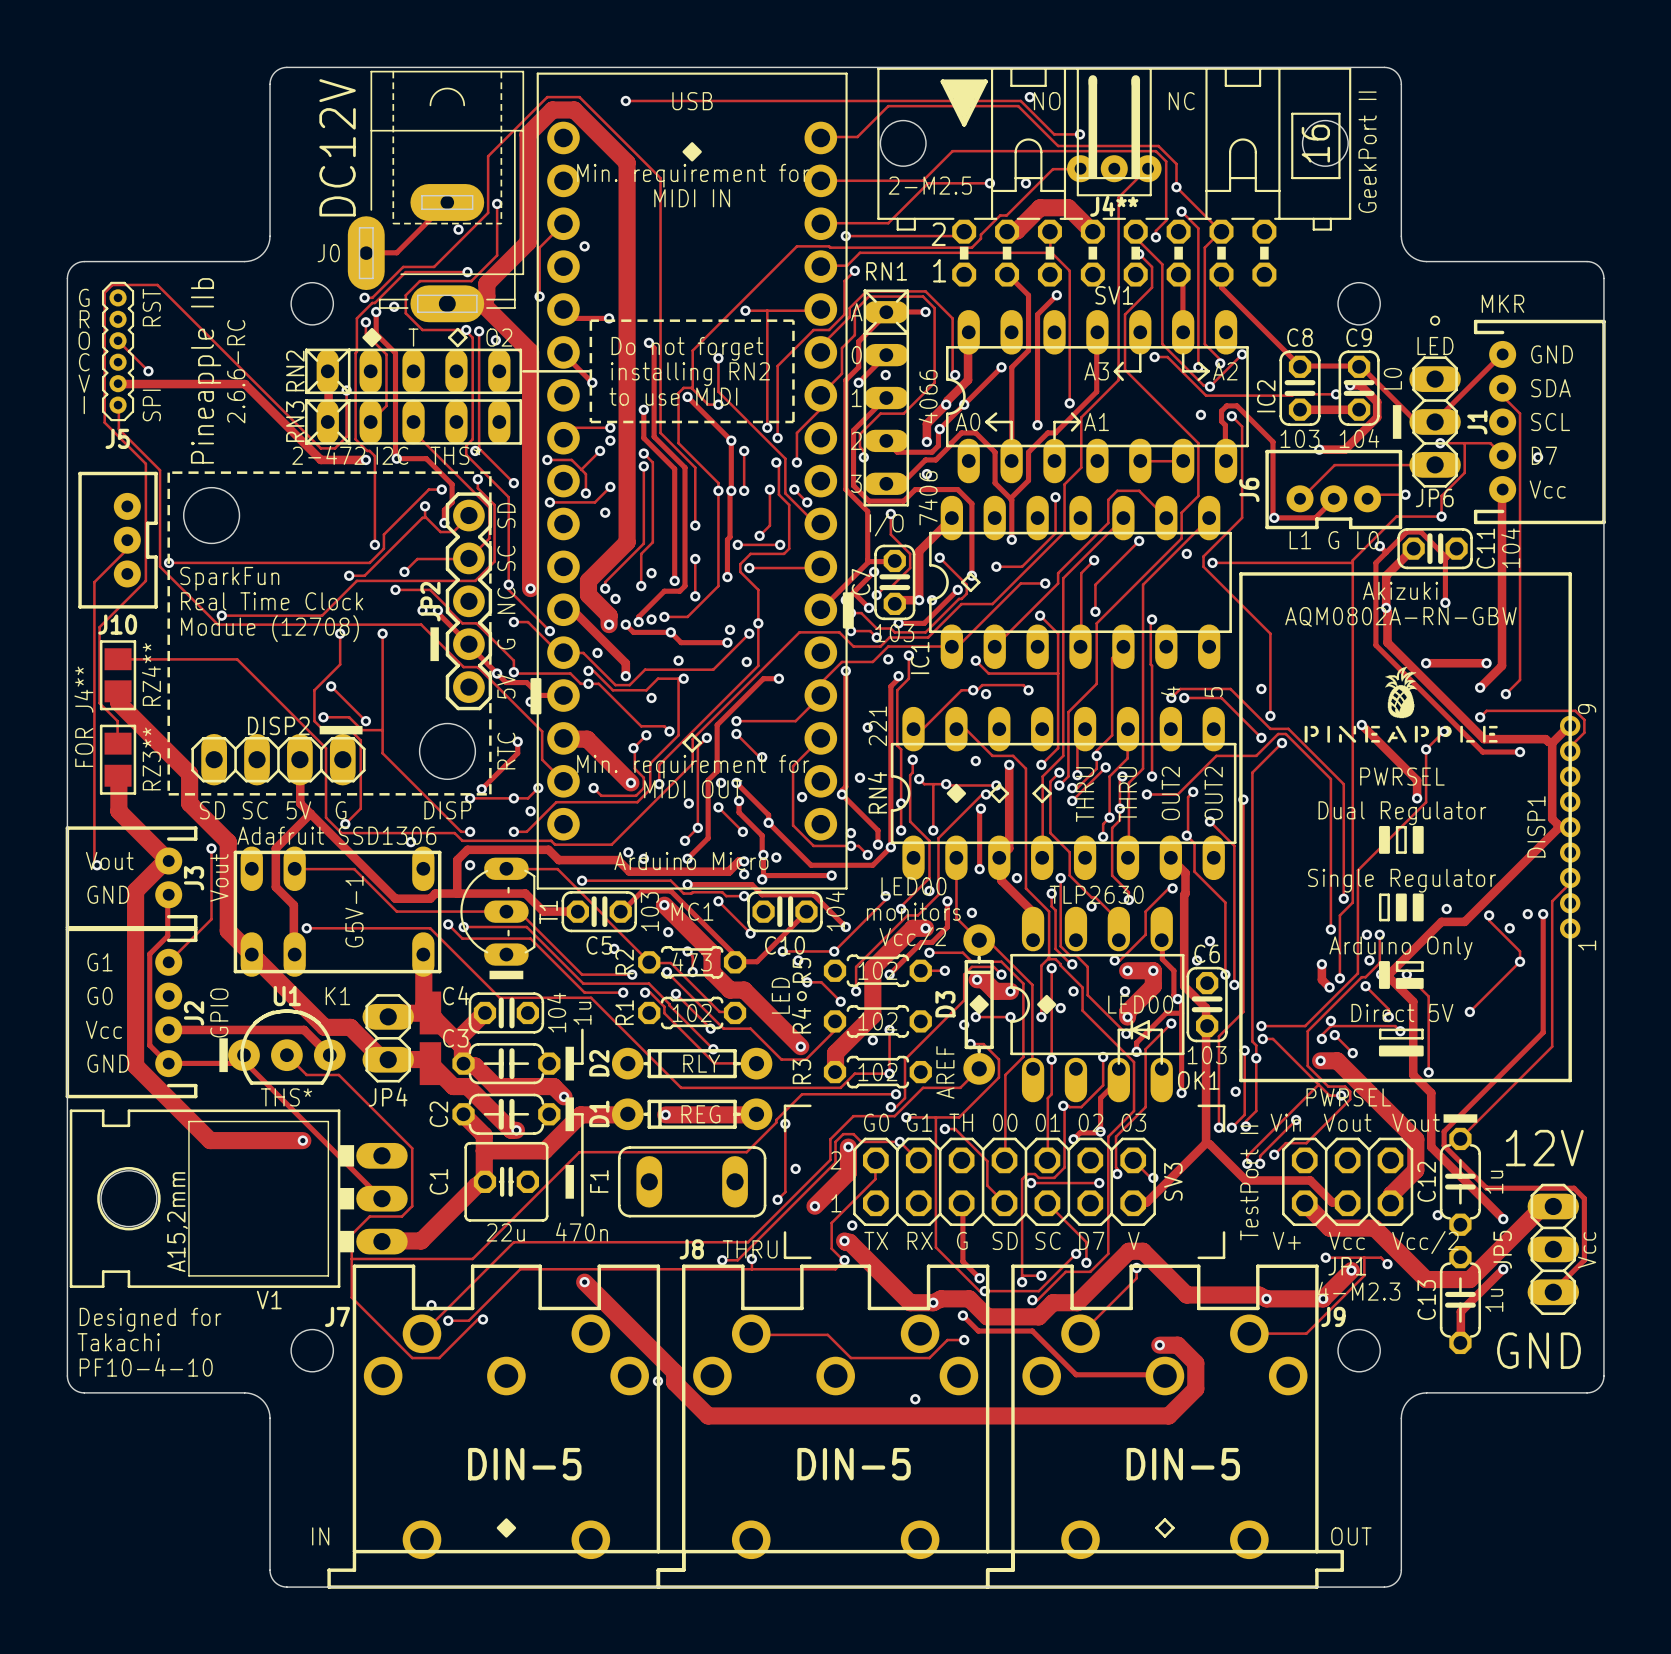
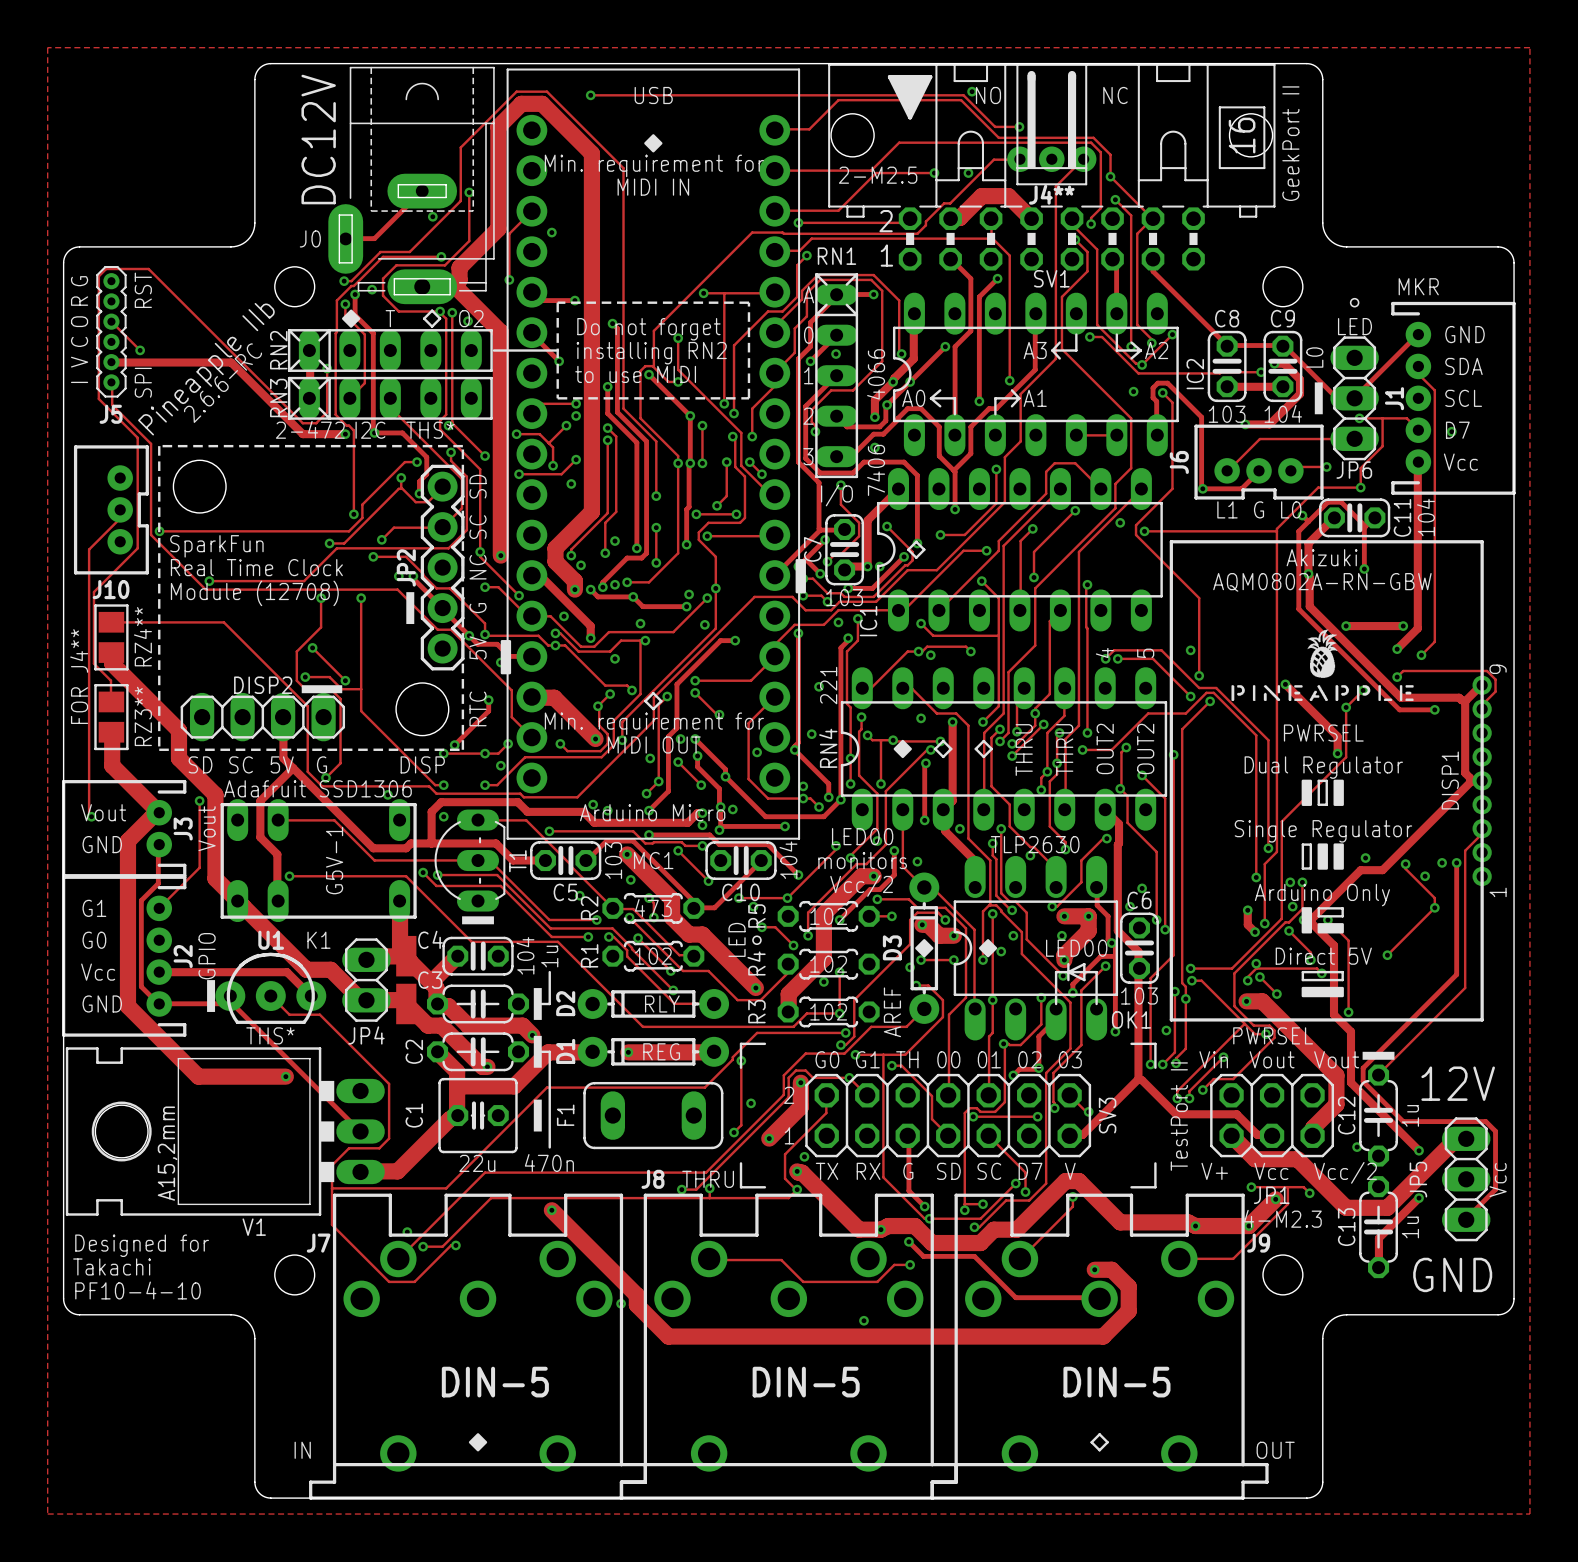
zone outline: none -> (47, 47) (1529, 47) (1529, 1514) (47, 1514) (47, 47)
text rotation: 0° (84, 297) -> 90° counterclockwise (79, 281)
text rotation: 0° (84, 319) -> 90° counterclockwise (79, 301)
text rotation: 0° (84, 340) -> 90° counterclockwise (79, 321)
text rotation: 0° (84, 362) -> 90° counterclockwise (79, 341)
text rotation: 0° (206, 370) -> 45° clockwise (206, 369)
text rotation: 0° (236, 371) -> 45° clockwise (223, 383)
text rotation: 0° (84, 383) -> 90° counterclockwise (79, 362)
text rotation: 0° (84, 405) -> 90° counterclockwise (79, 382)

